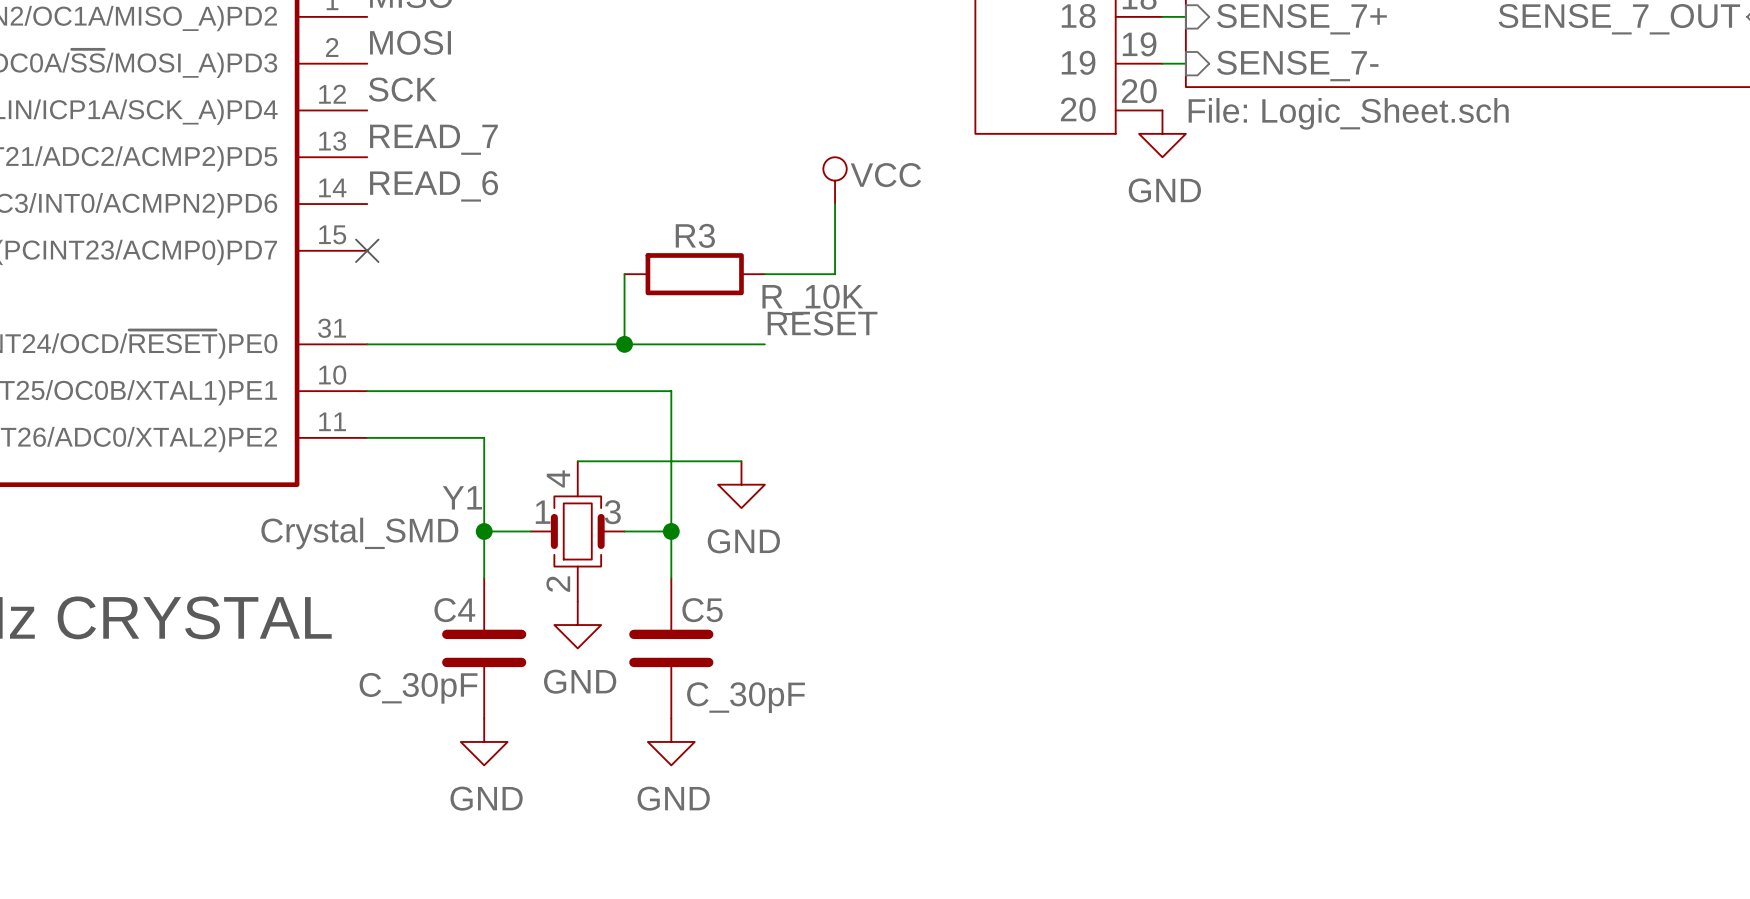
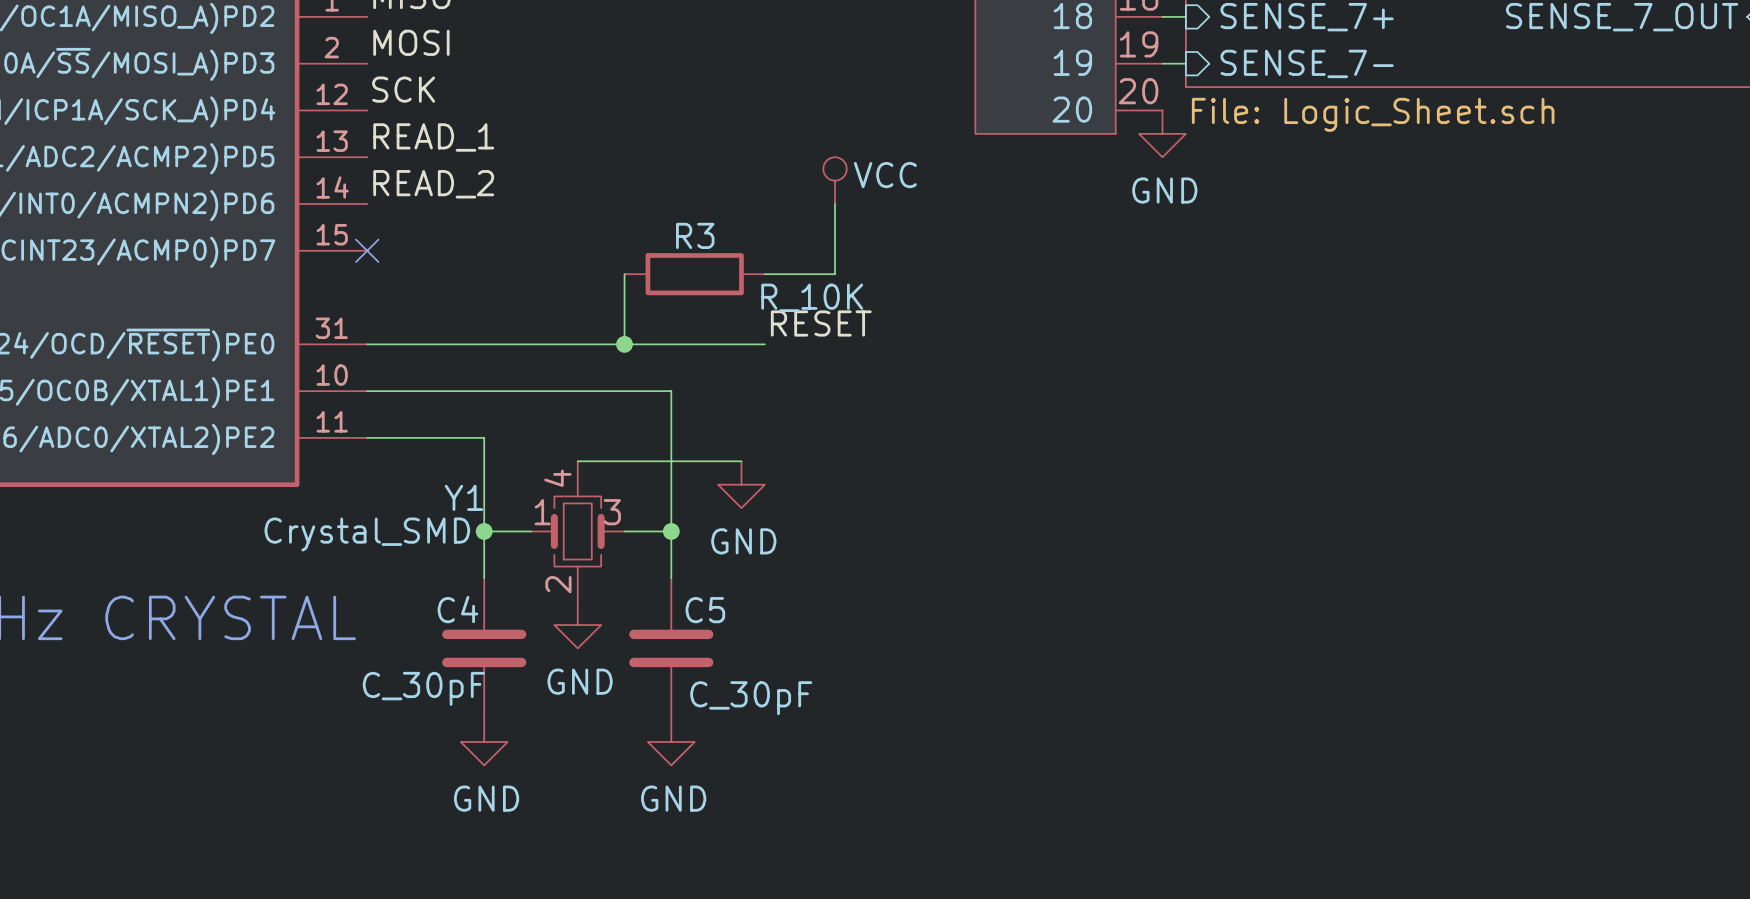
label: READ_7 (433, 139) -> READ_1 (433, 137)
label: READ_6 (434, 186) -> READ_2 (433, 184)

